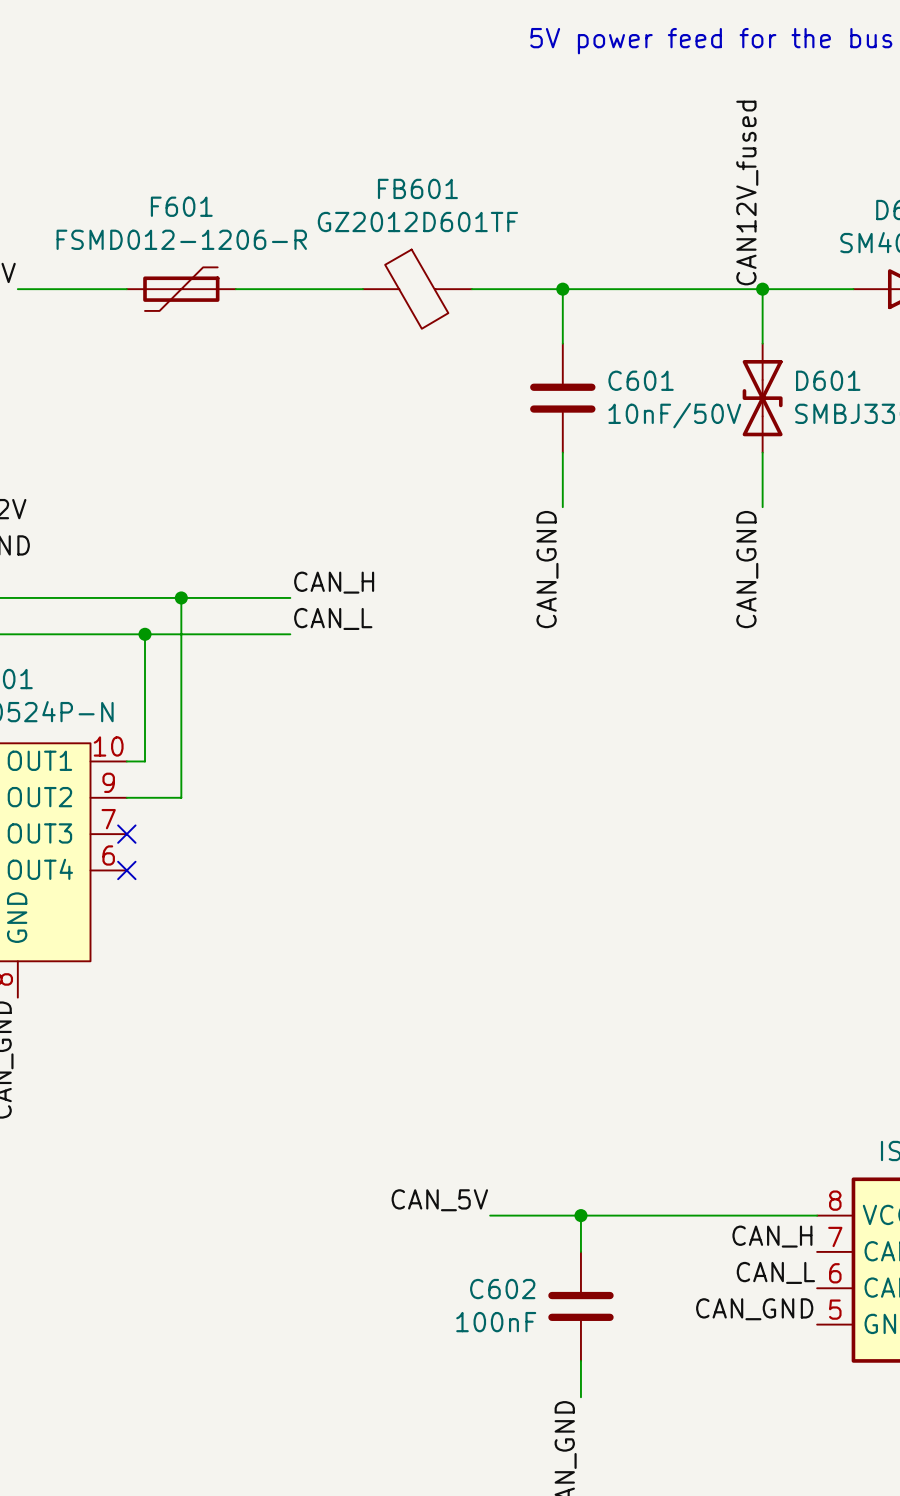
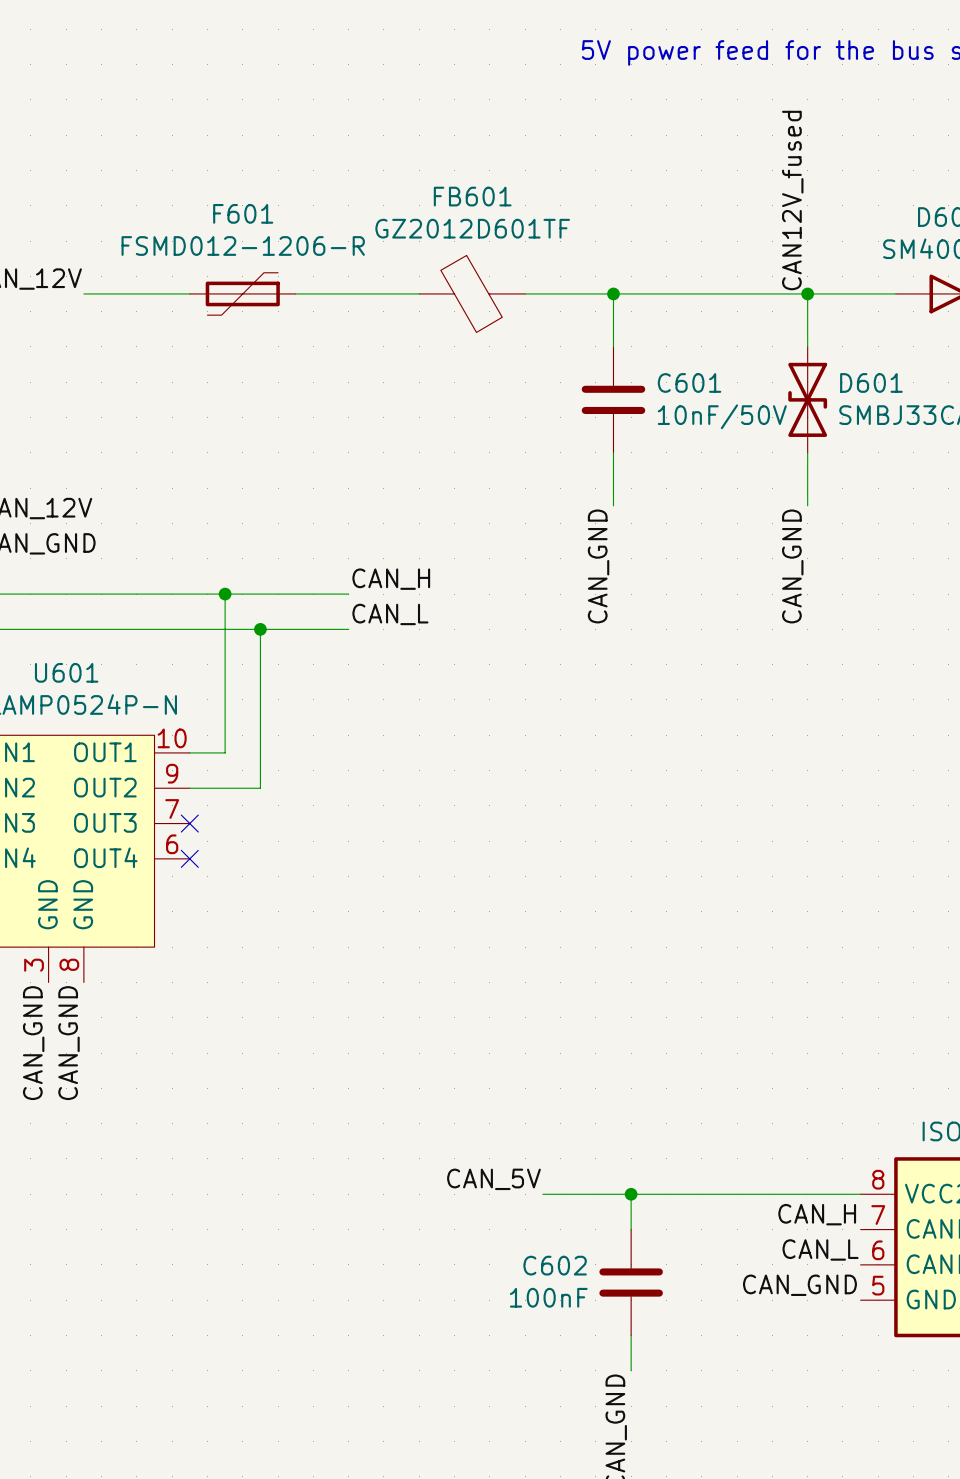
wire: (181, 597) (181, 797) -> (260, 629) (260, 788) (242, 788)
junction position: (181, 597) -> (225, 594)
wire: (145, 634) (145, 761) -> (225, 594) (225, 752) (207, 752)
junction: (145, 634) -> none
junction: none -> (260, 629)

